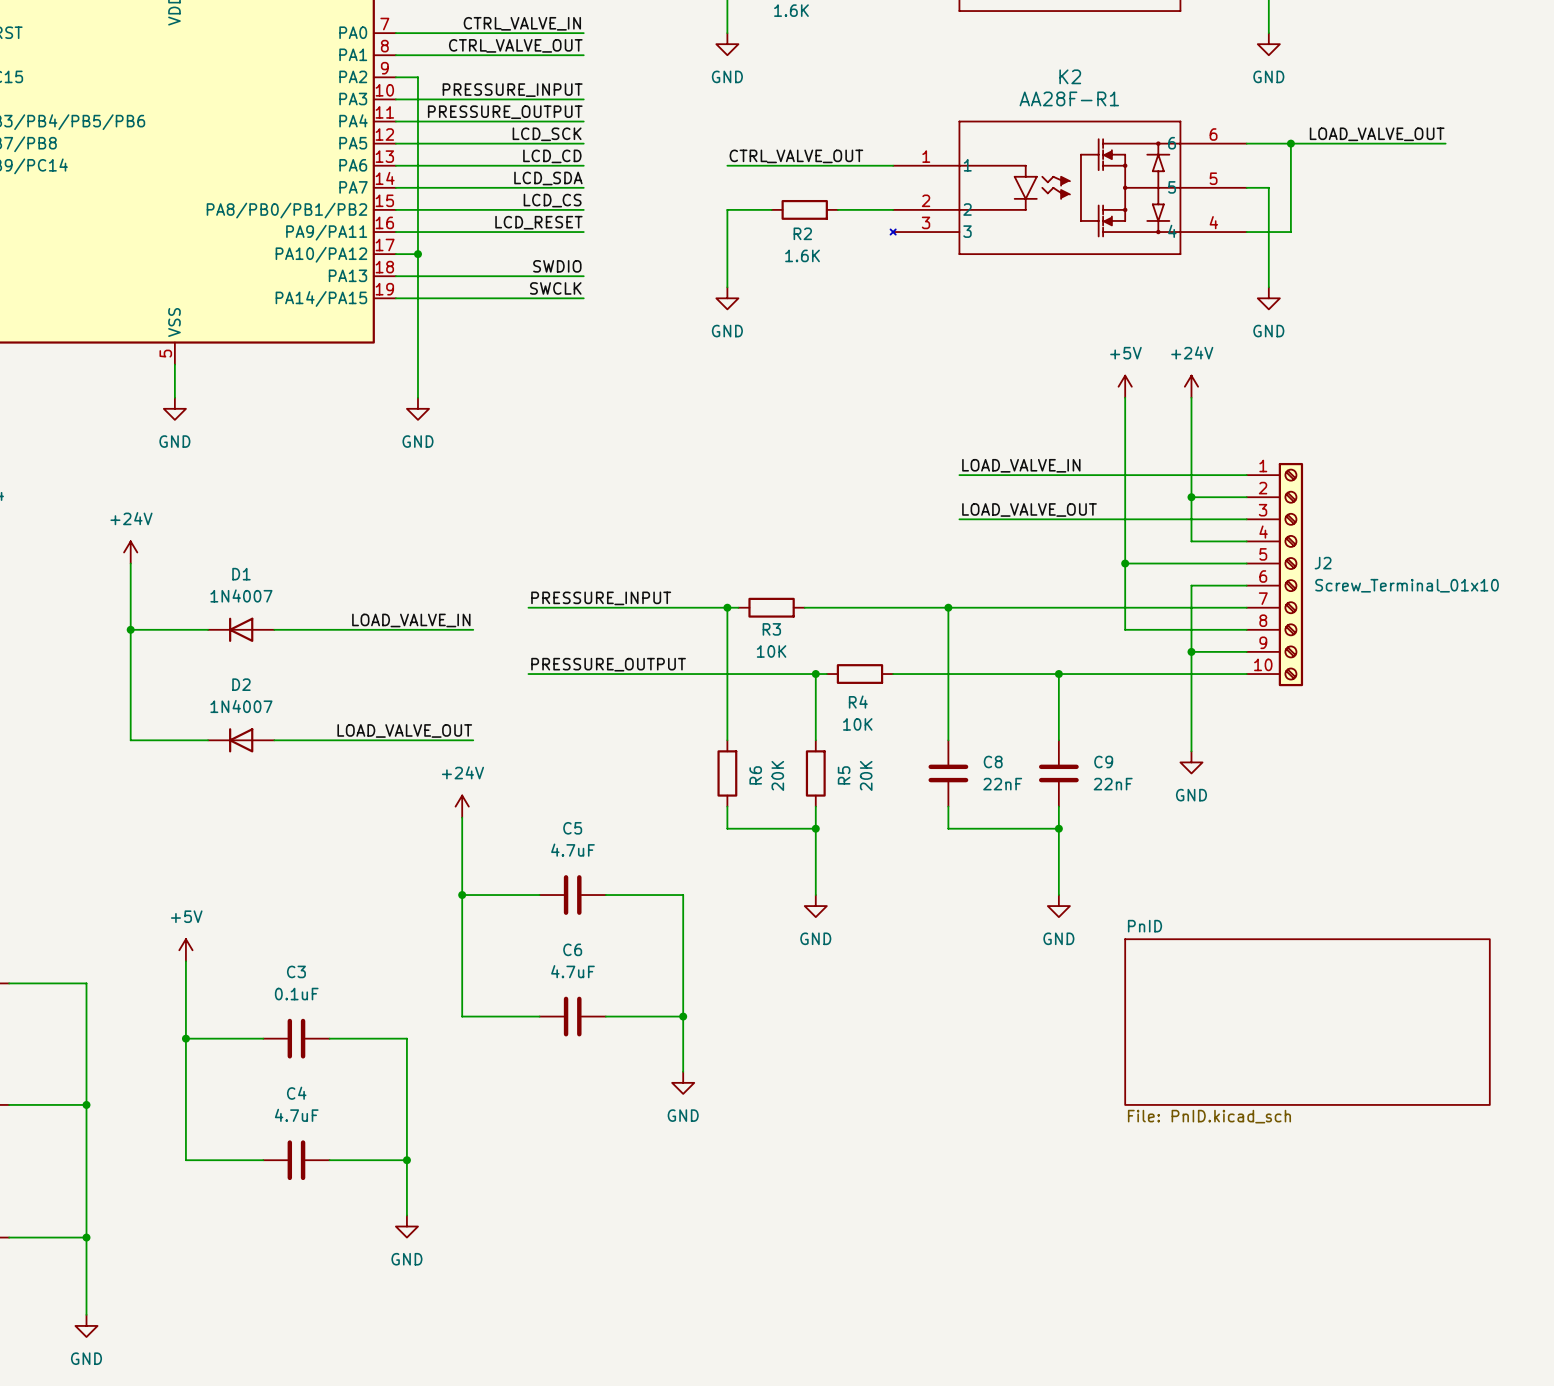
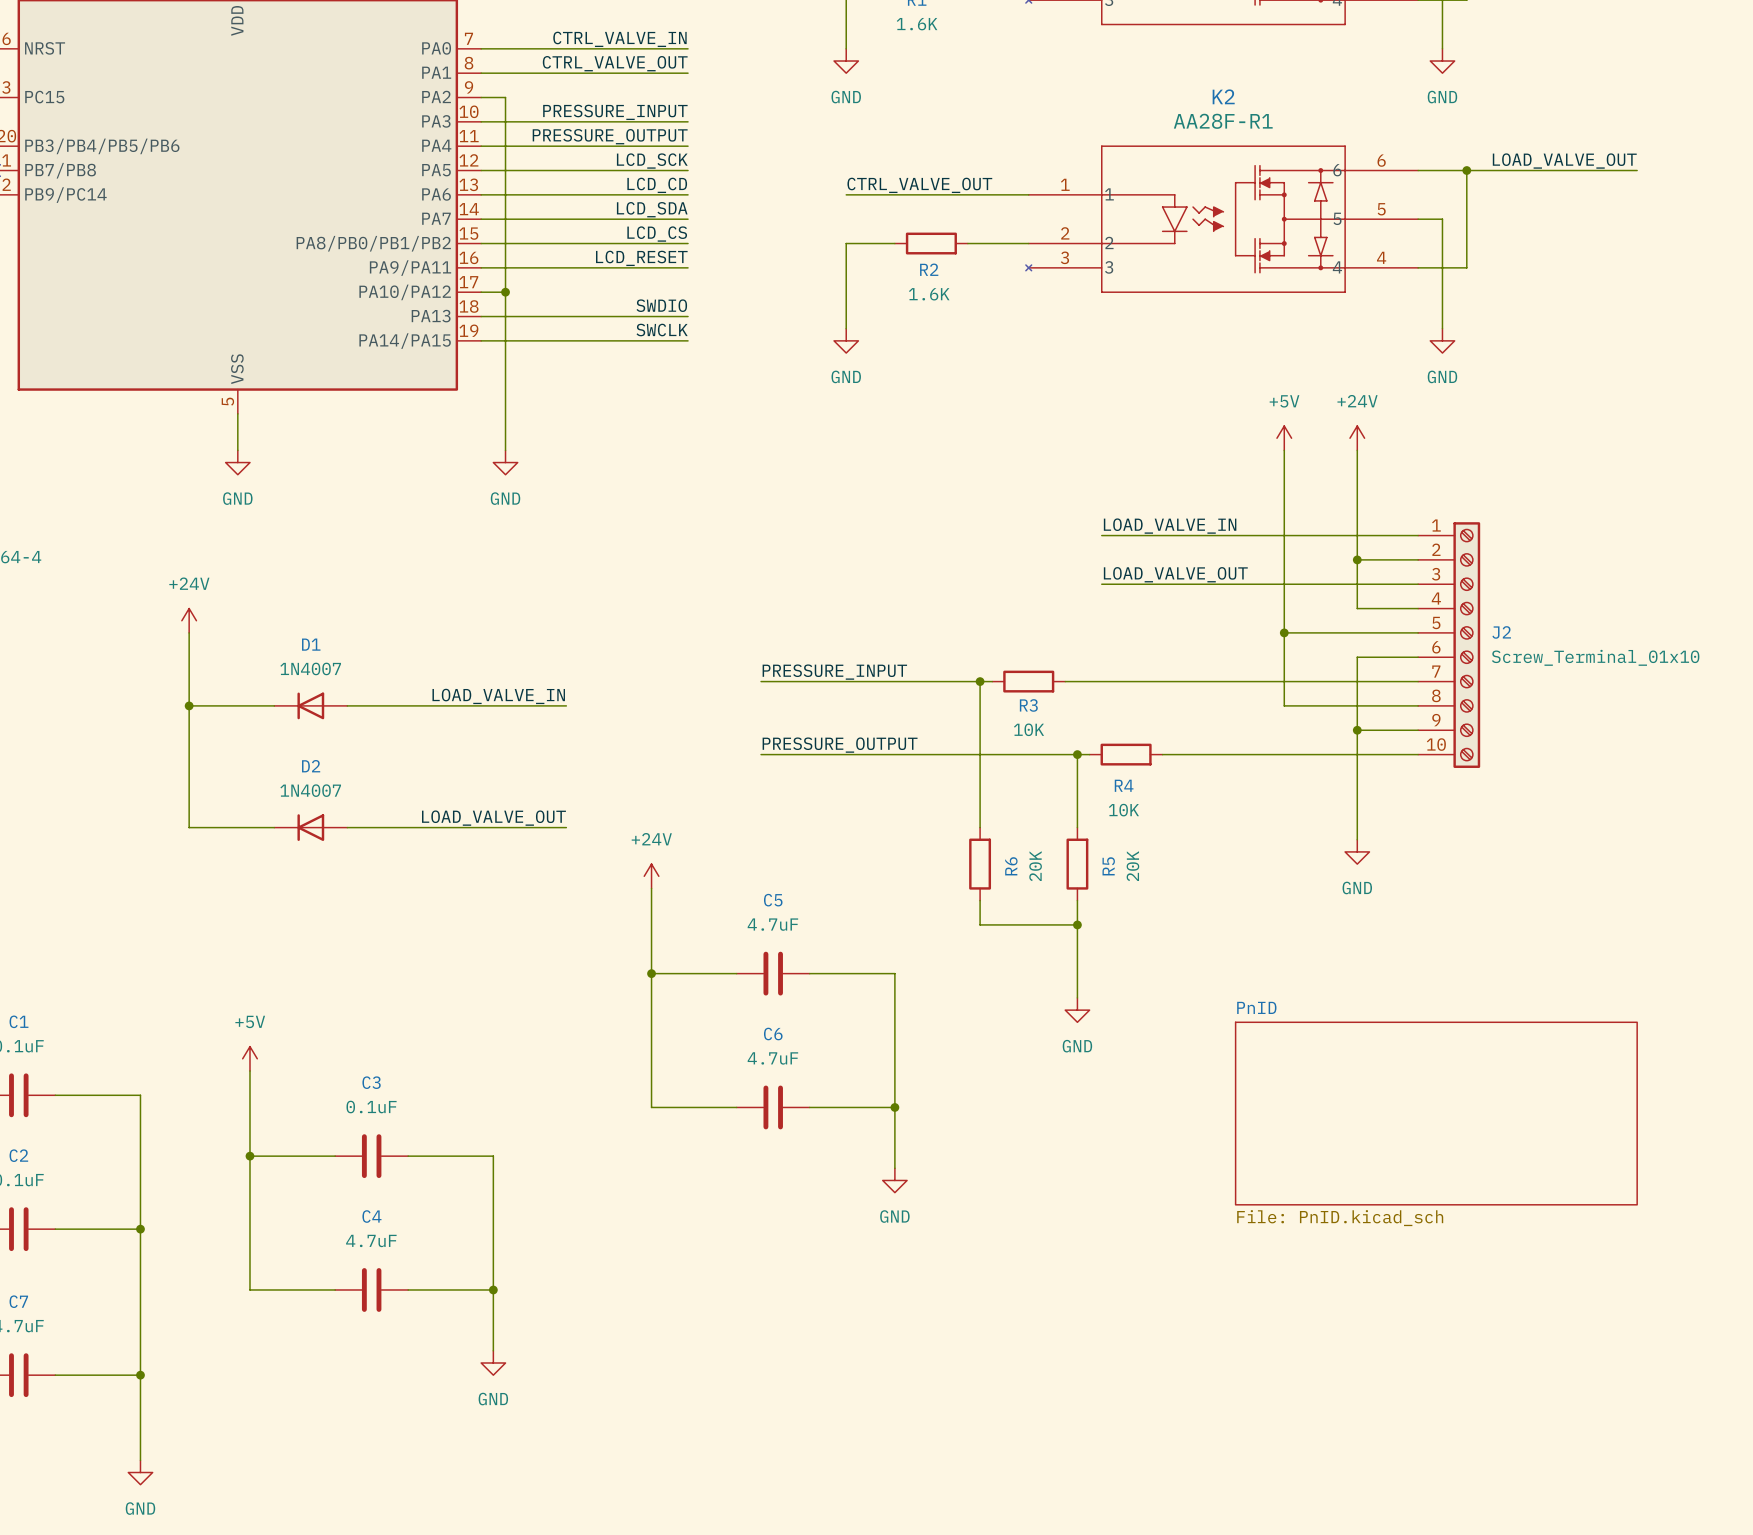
label position: PRESSURE_INPUT (601, 598) -> PRESSURE_INPUT (834, 672)
wire: (528, 607) (650, 607) -> none
wire: (727, 607) (727, 740) -> (980, 681) (980, 827)
junction: (727, 607) -> none
R3 position: (771, 607) -> (1028, 681)
junction: none -> (980, 681)
wire: (859, 607) (926, 607) -> (858, 681) (931, 681)
wire: (948, 607) (948, 740) -> none
junction: (948, 607) -> none
label position: PRESSURE_OUTPUT (608, 664) -> PRESSURE_OUTPUT (840, 745)
wire: (528, 674) (650, 674) -> none
wire: (815, 674) (815, 740) -> (1077, 754) (1077, 827)
junction: (815, 674) -> none
R4 position: (859, 674) -> (1126, 754)
junction: none -> (1077, 754)
wire: (948, 674) (1014, 674) -> (955, 754) (1028, 754)
wire: (1058, 674) (1058, 740) -> none
junction: (1058, 674) -> none
R6 position: (727, 773) -> (980, 864)
R5 position: (815, 773) -> (1077, 864)
C8: 22nF (948, 773) -> none
C9: 22nF (1058, 773) -> none
power symbol position: +24V (462, 806) -> +24V (651, 876)
wire: (727, 806) (727, 828) (815, 828) -> (980, 900) (980, 924) (1077, 924)
wire: (815, 806) (815, 895) -> (1077, 900) (1077, 997)
wire: (948, 806) (948, 828) (1058, 828) -> none
wire: (1058, 806) (1058, 895) -> none
wire: (462, 817) (462, 1016) (539, 1016) -> (651, 888) (651, 1107) (736, 1107)
junction: (815, 828) -> none
junction: none -> (1077, 924)
junction: (1058, 828) -> none
junction: none -> (651, 973)
wire: (462, 895) (539, 895) -> (651, 973) (736, 973)
junction: (462, 895) -> none
C5 position: (572, 895) -> (773, 973)
wire: (605, 895) (683, 895) (683, 1071) -> (809, 973) (894, 973) (894, 1168)
power symbol: GND (815, 906) -> none
power symbol: none -> GND (1077, 1010)
power symbol: GND (1058, 906) -> none
junction: none -> (894, 1107)
C6 position: (572, 1016) -> (773, 1107)
wire: (605, 1016) (683, 1016) -> (809, 1107) (894, 1107)
junction: (683, 1016) -> none
sheet PnID position: (1307, 1022) -> (1436, 1113)
power symbol: none -> GND (894, 1180)
power symbol: GND (683, 1082) -> none

